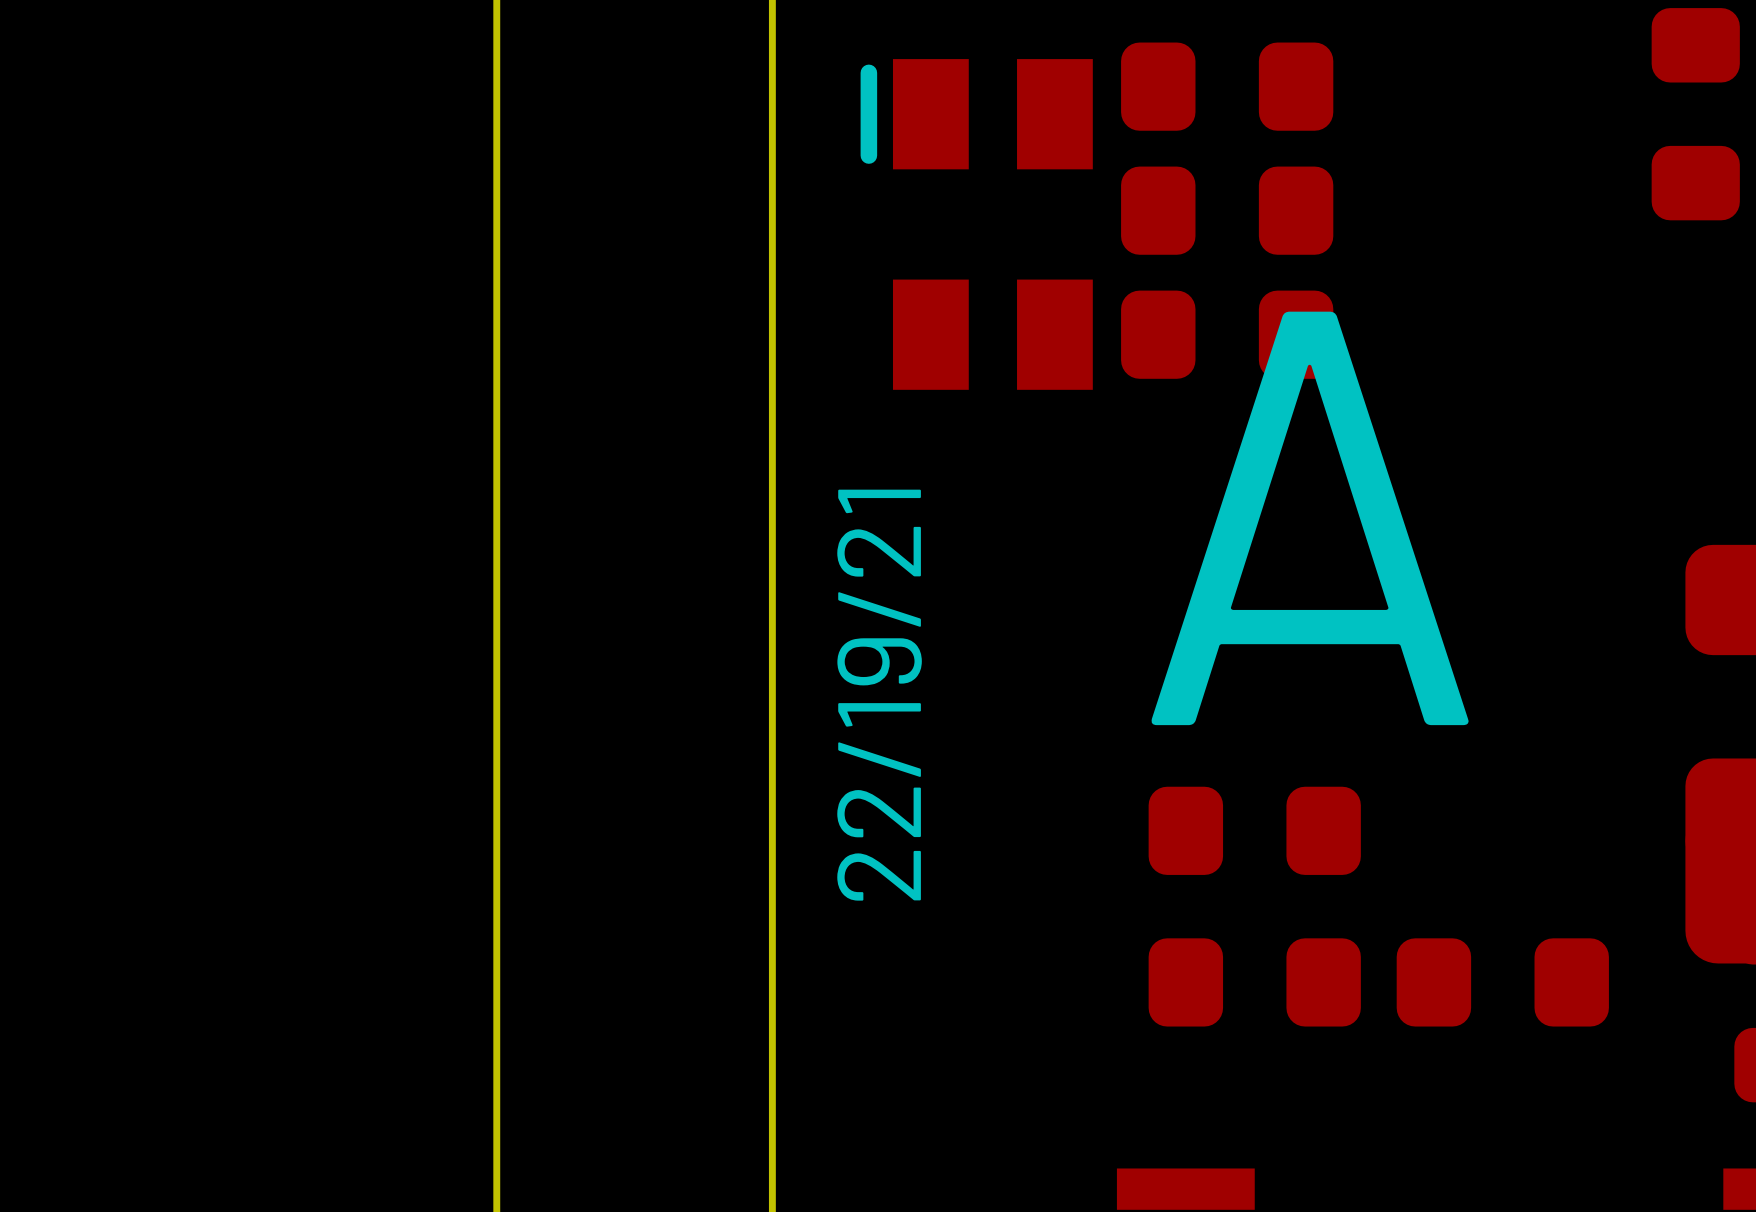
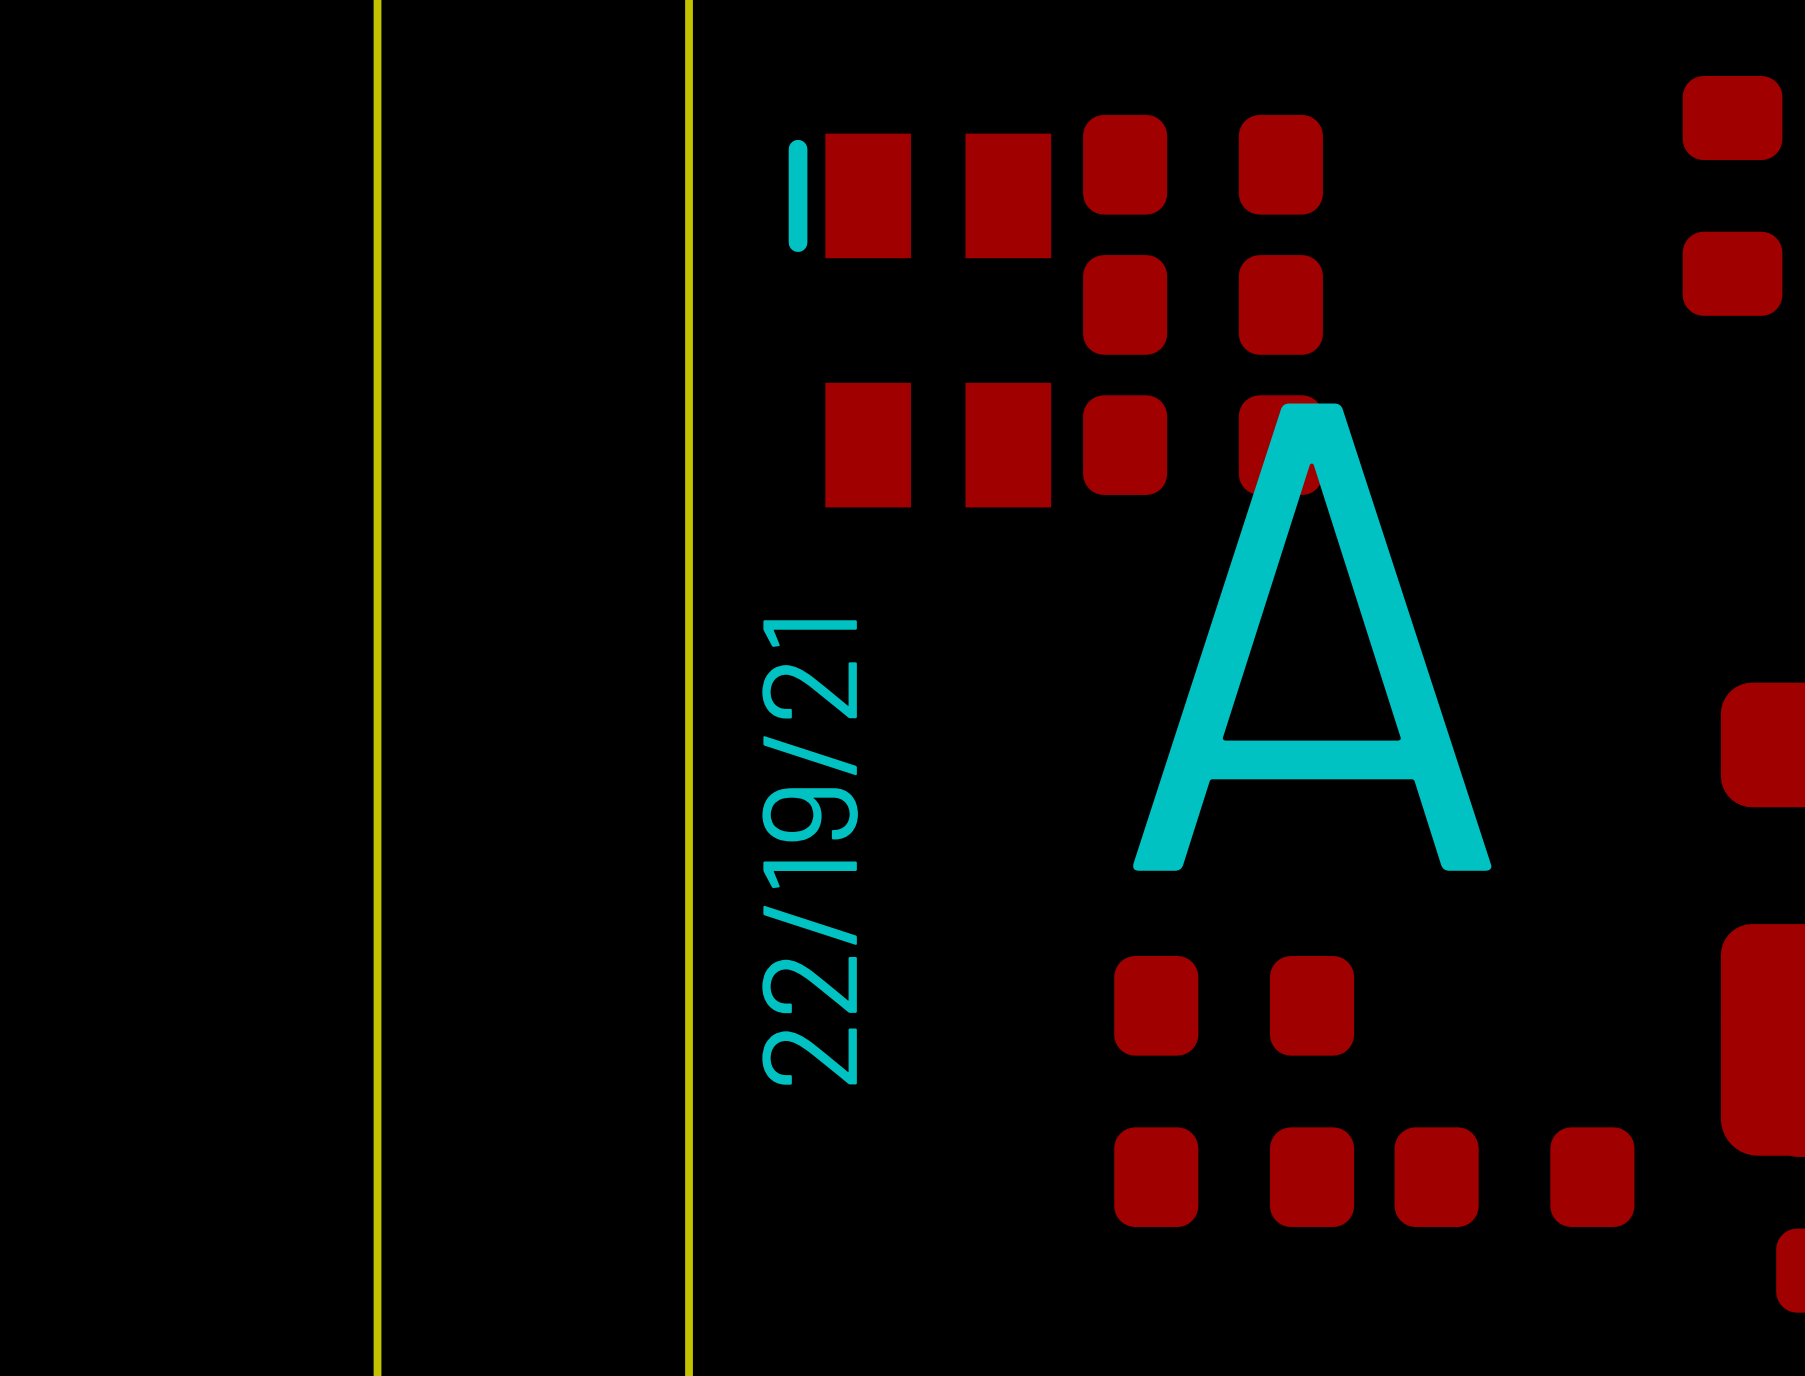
text position: A (1309, 518) -> A (1311, 637)

